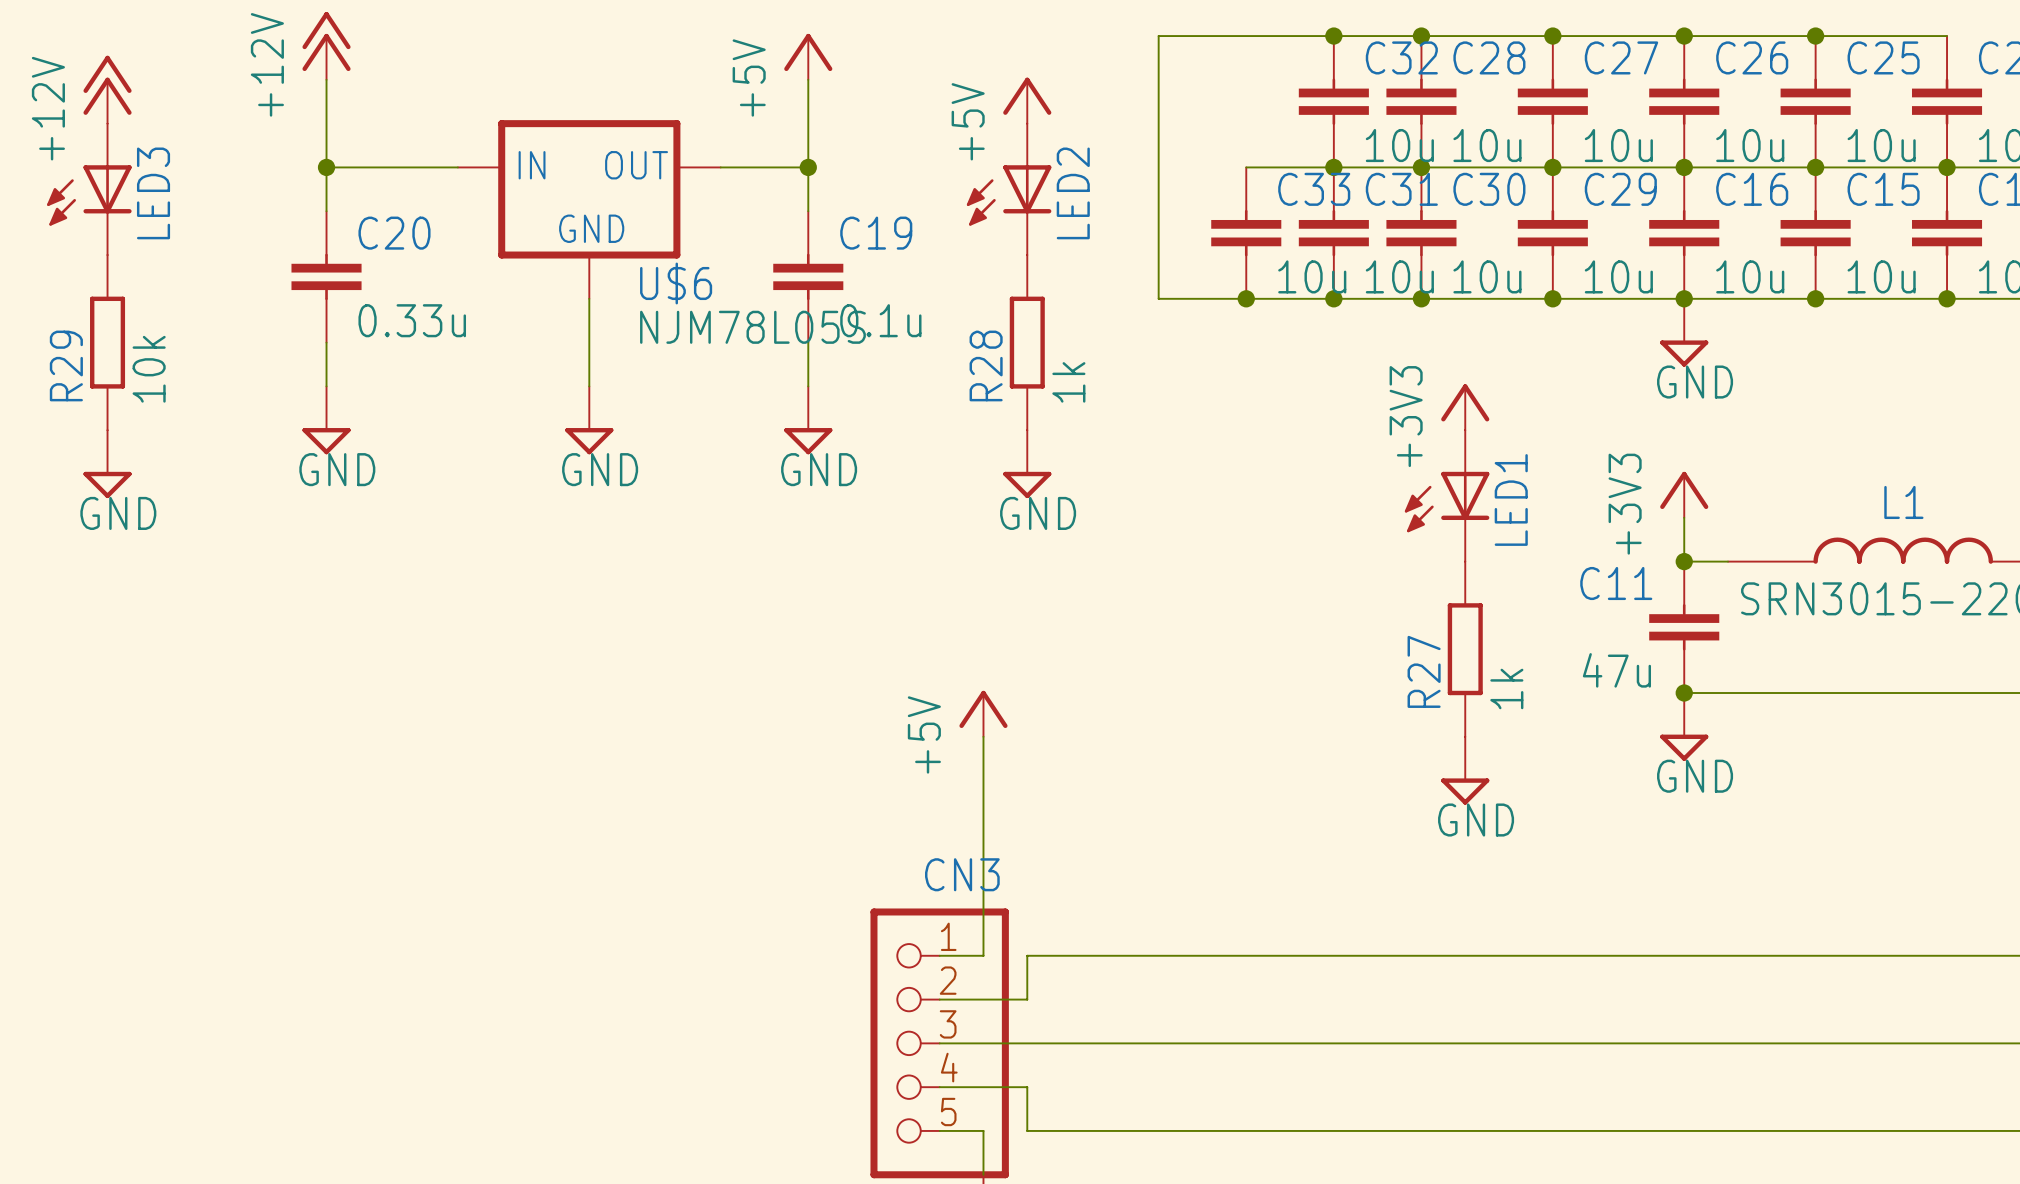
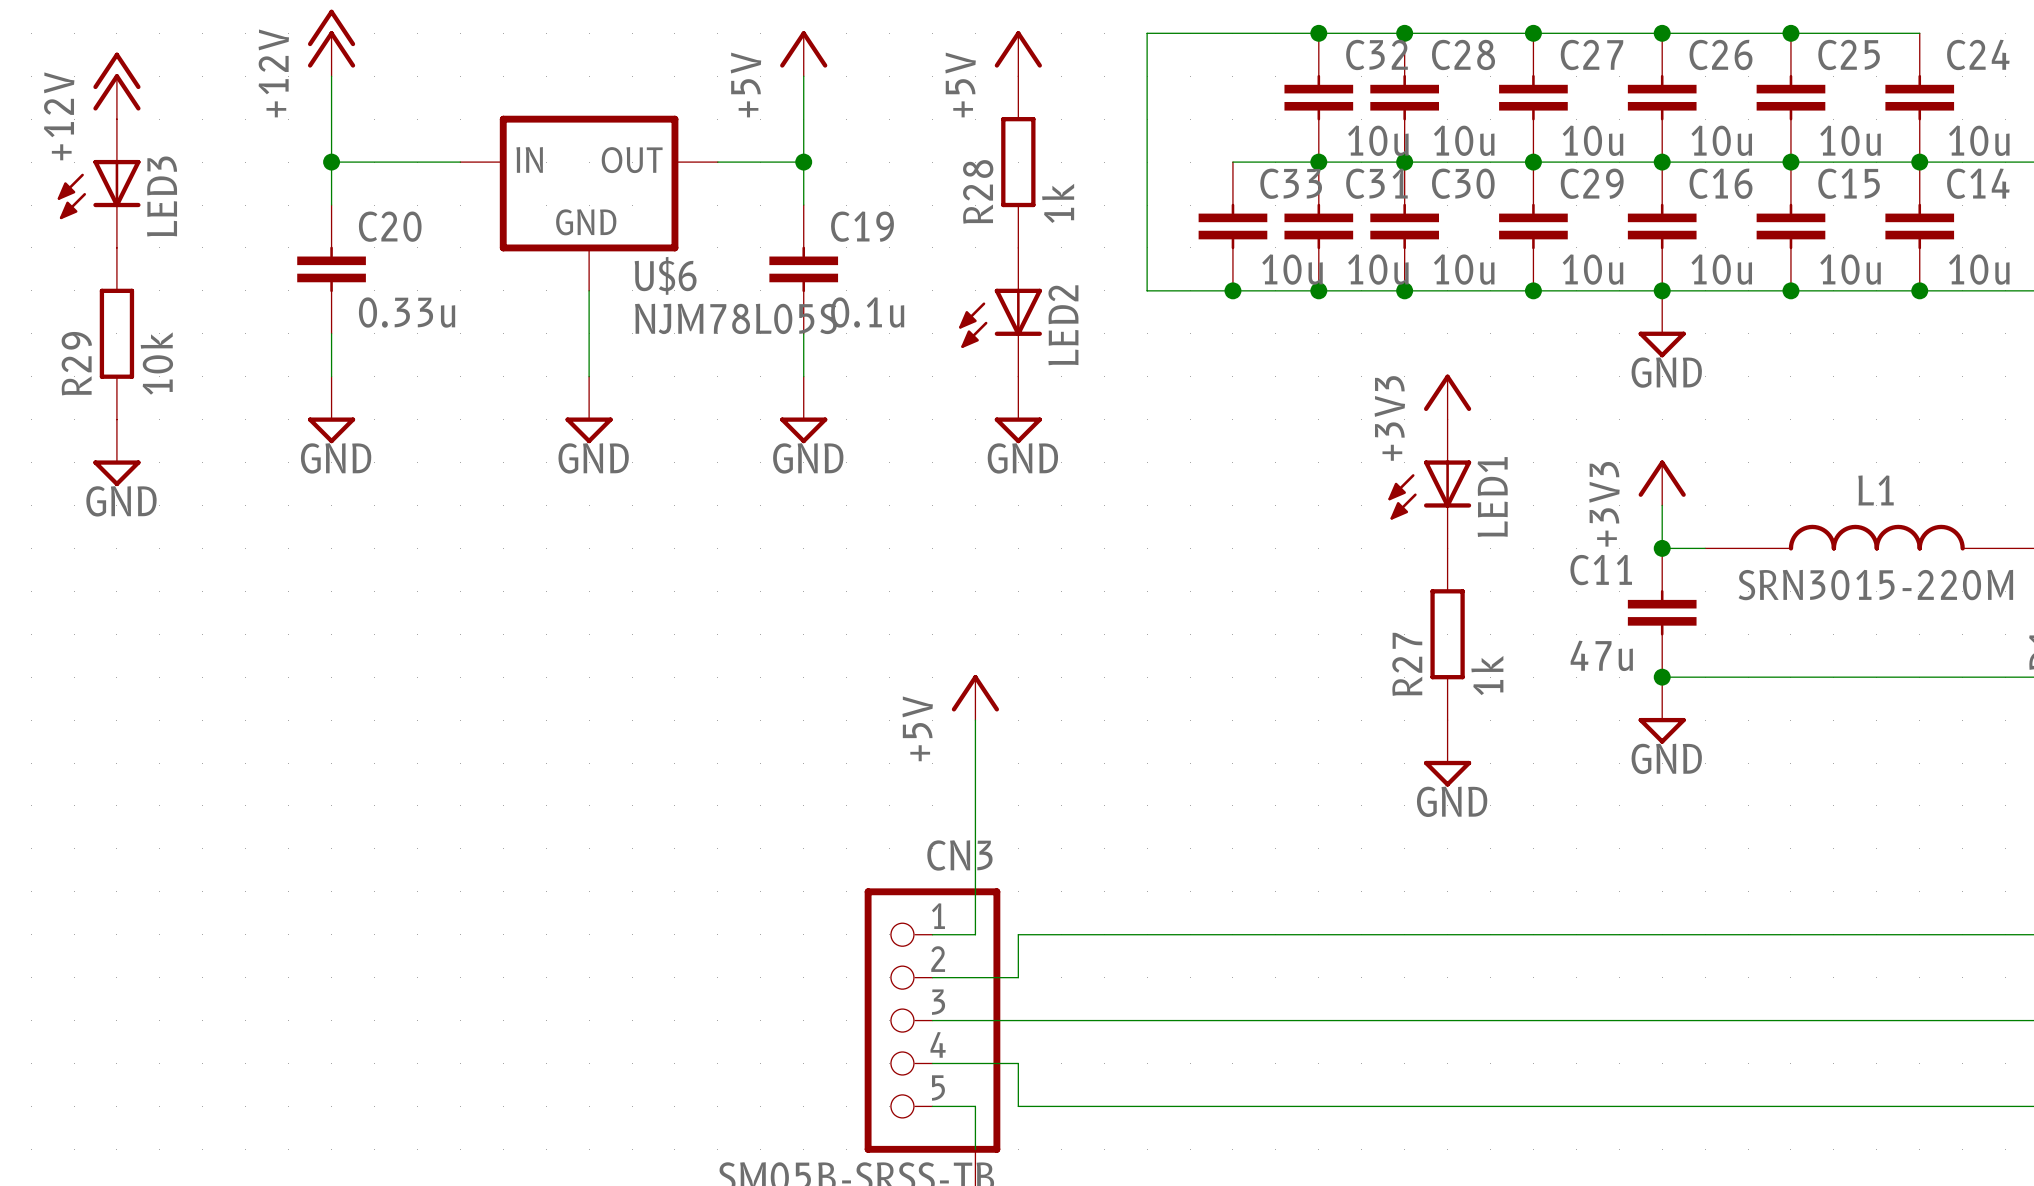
power symbol position: +5V (1027, 100) -> +5V (1018, 53)
LED2 position: (1009, 189) -> (1000, 312)
R28 position: (1027, 342) -> (1018, 162)
power symbol position: GND (1027, 464) -> GND (1018, 409)

